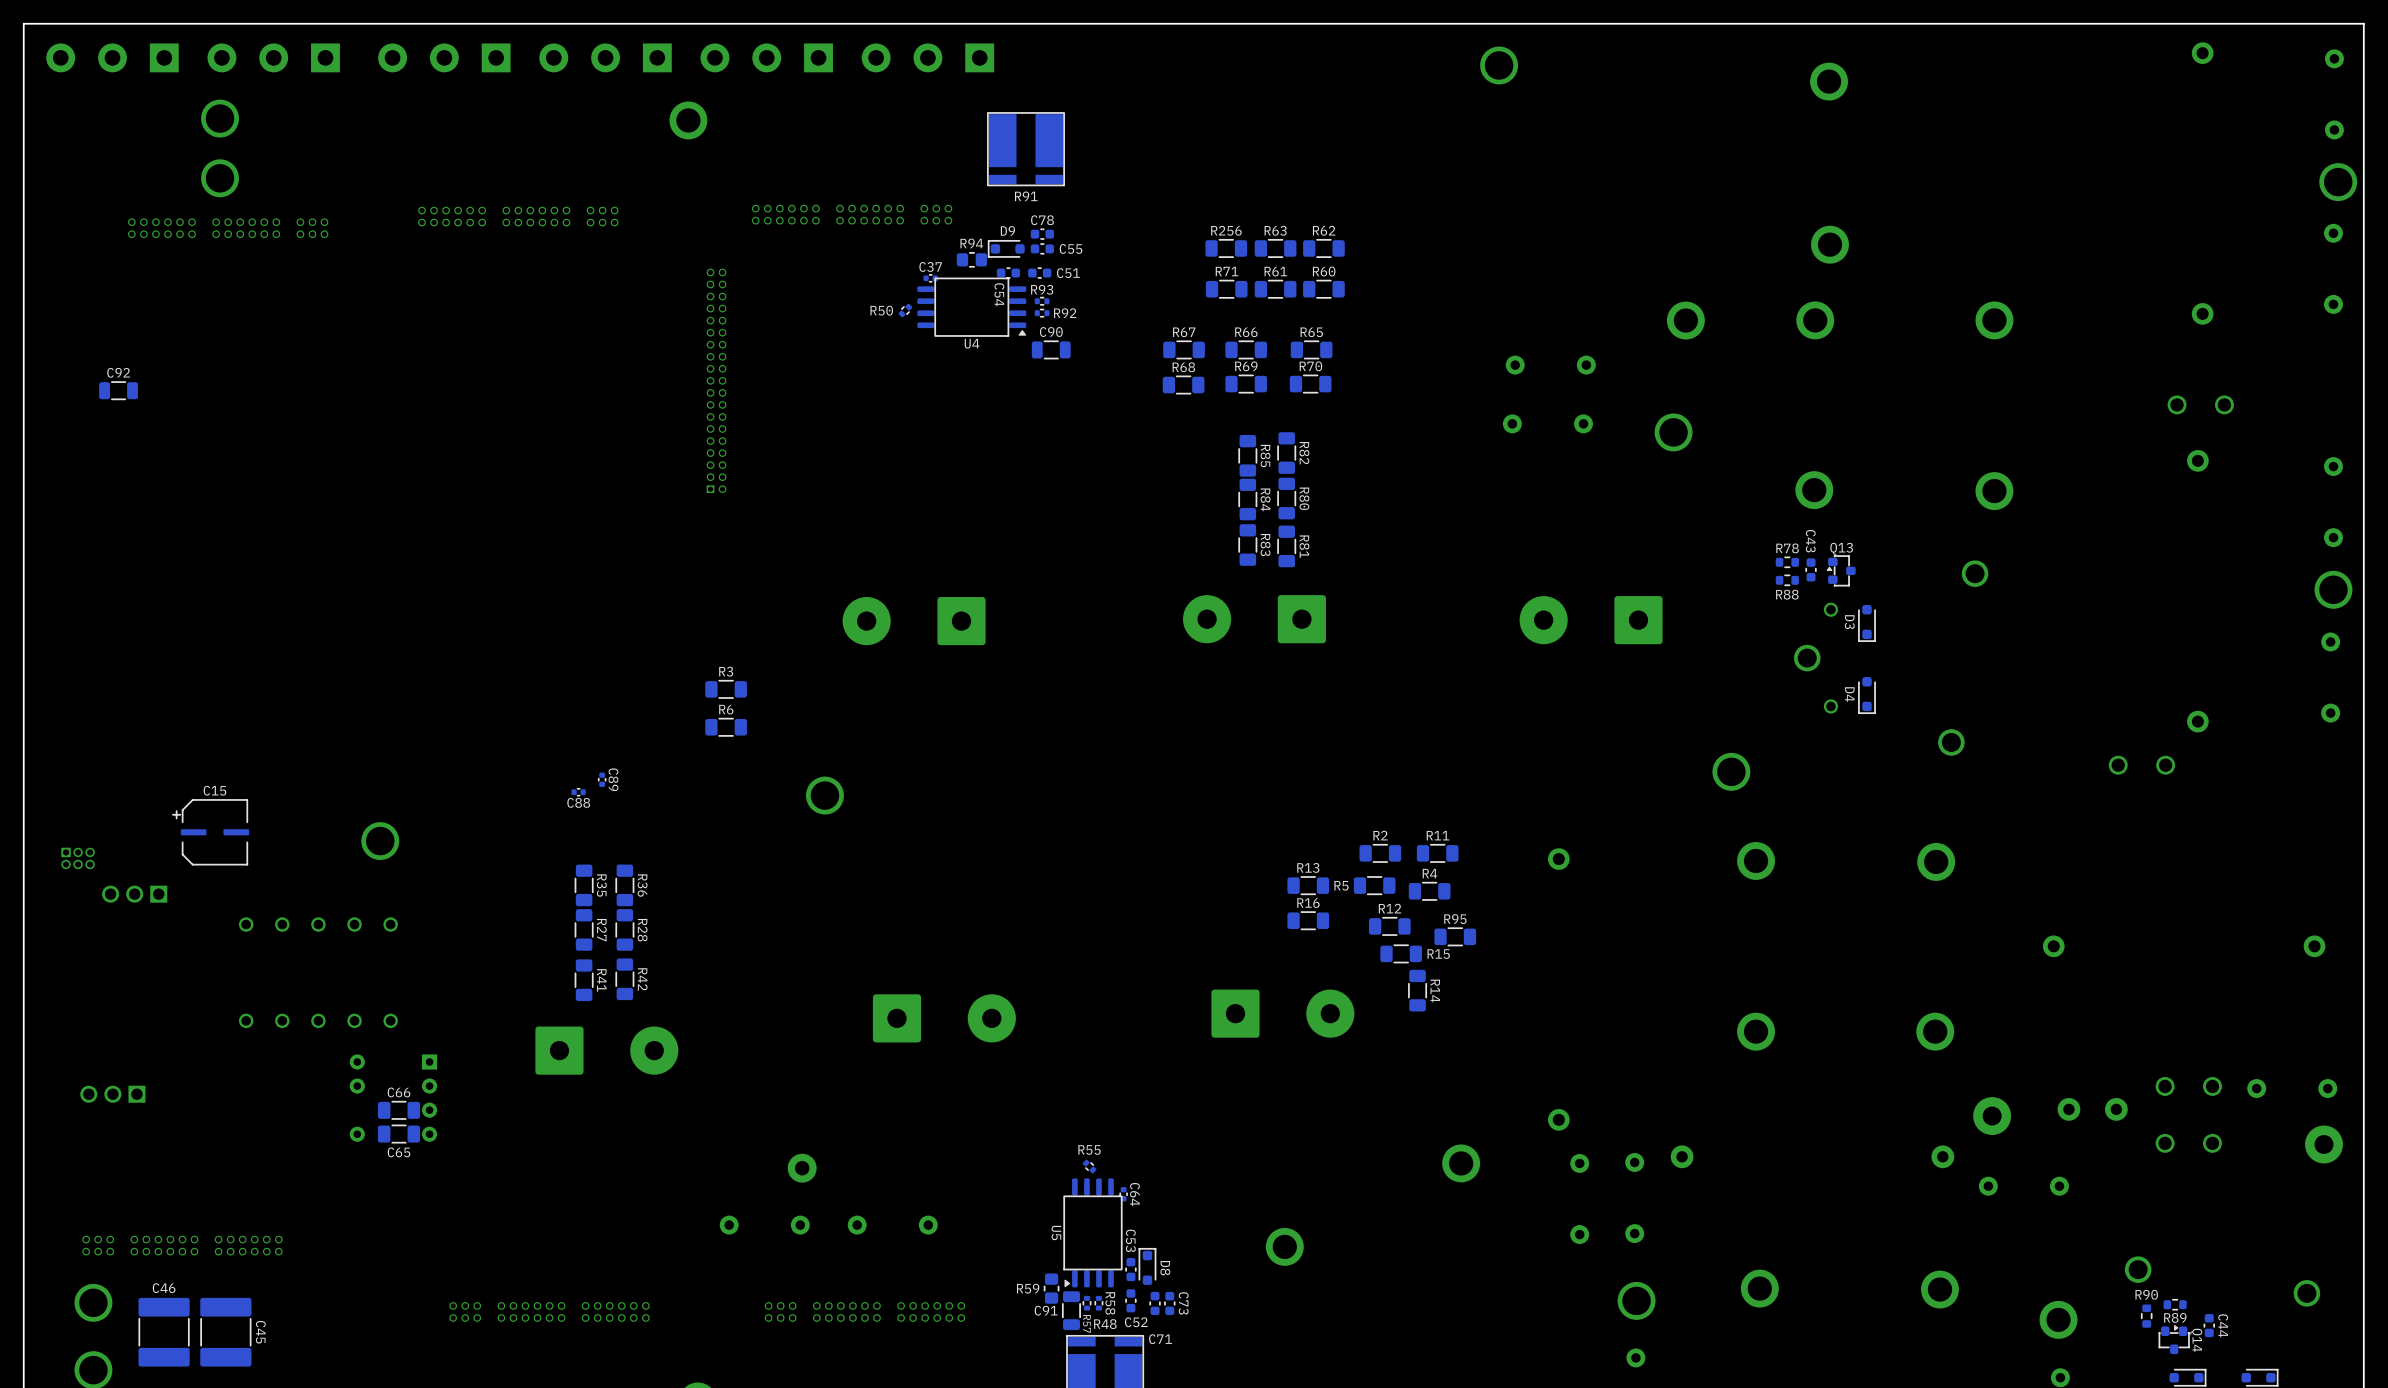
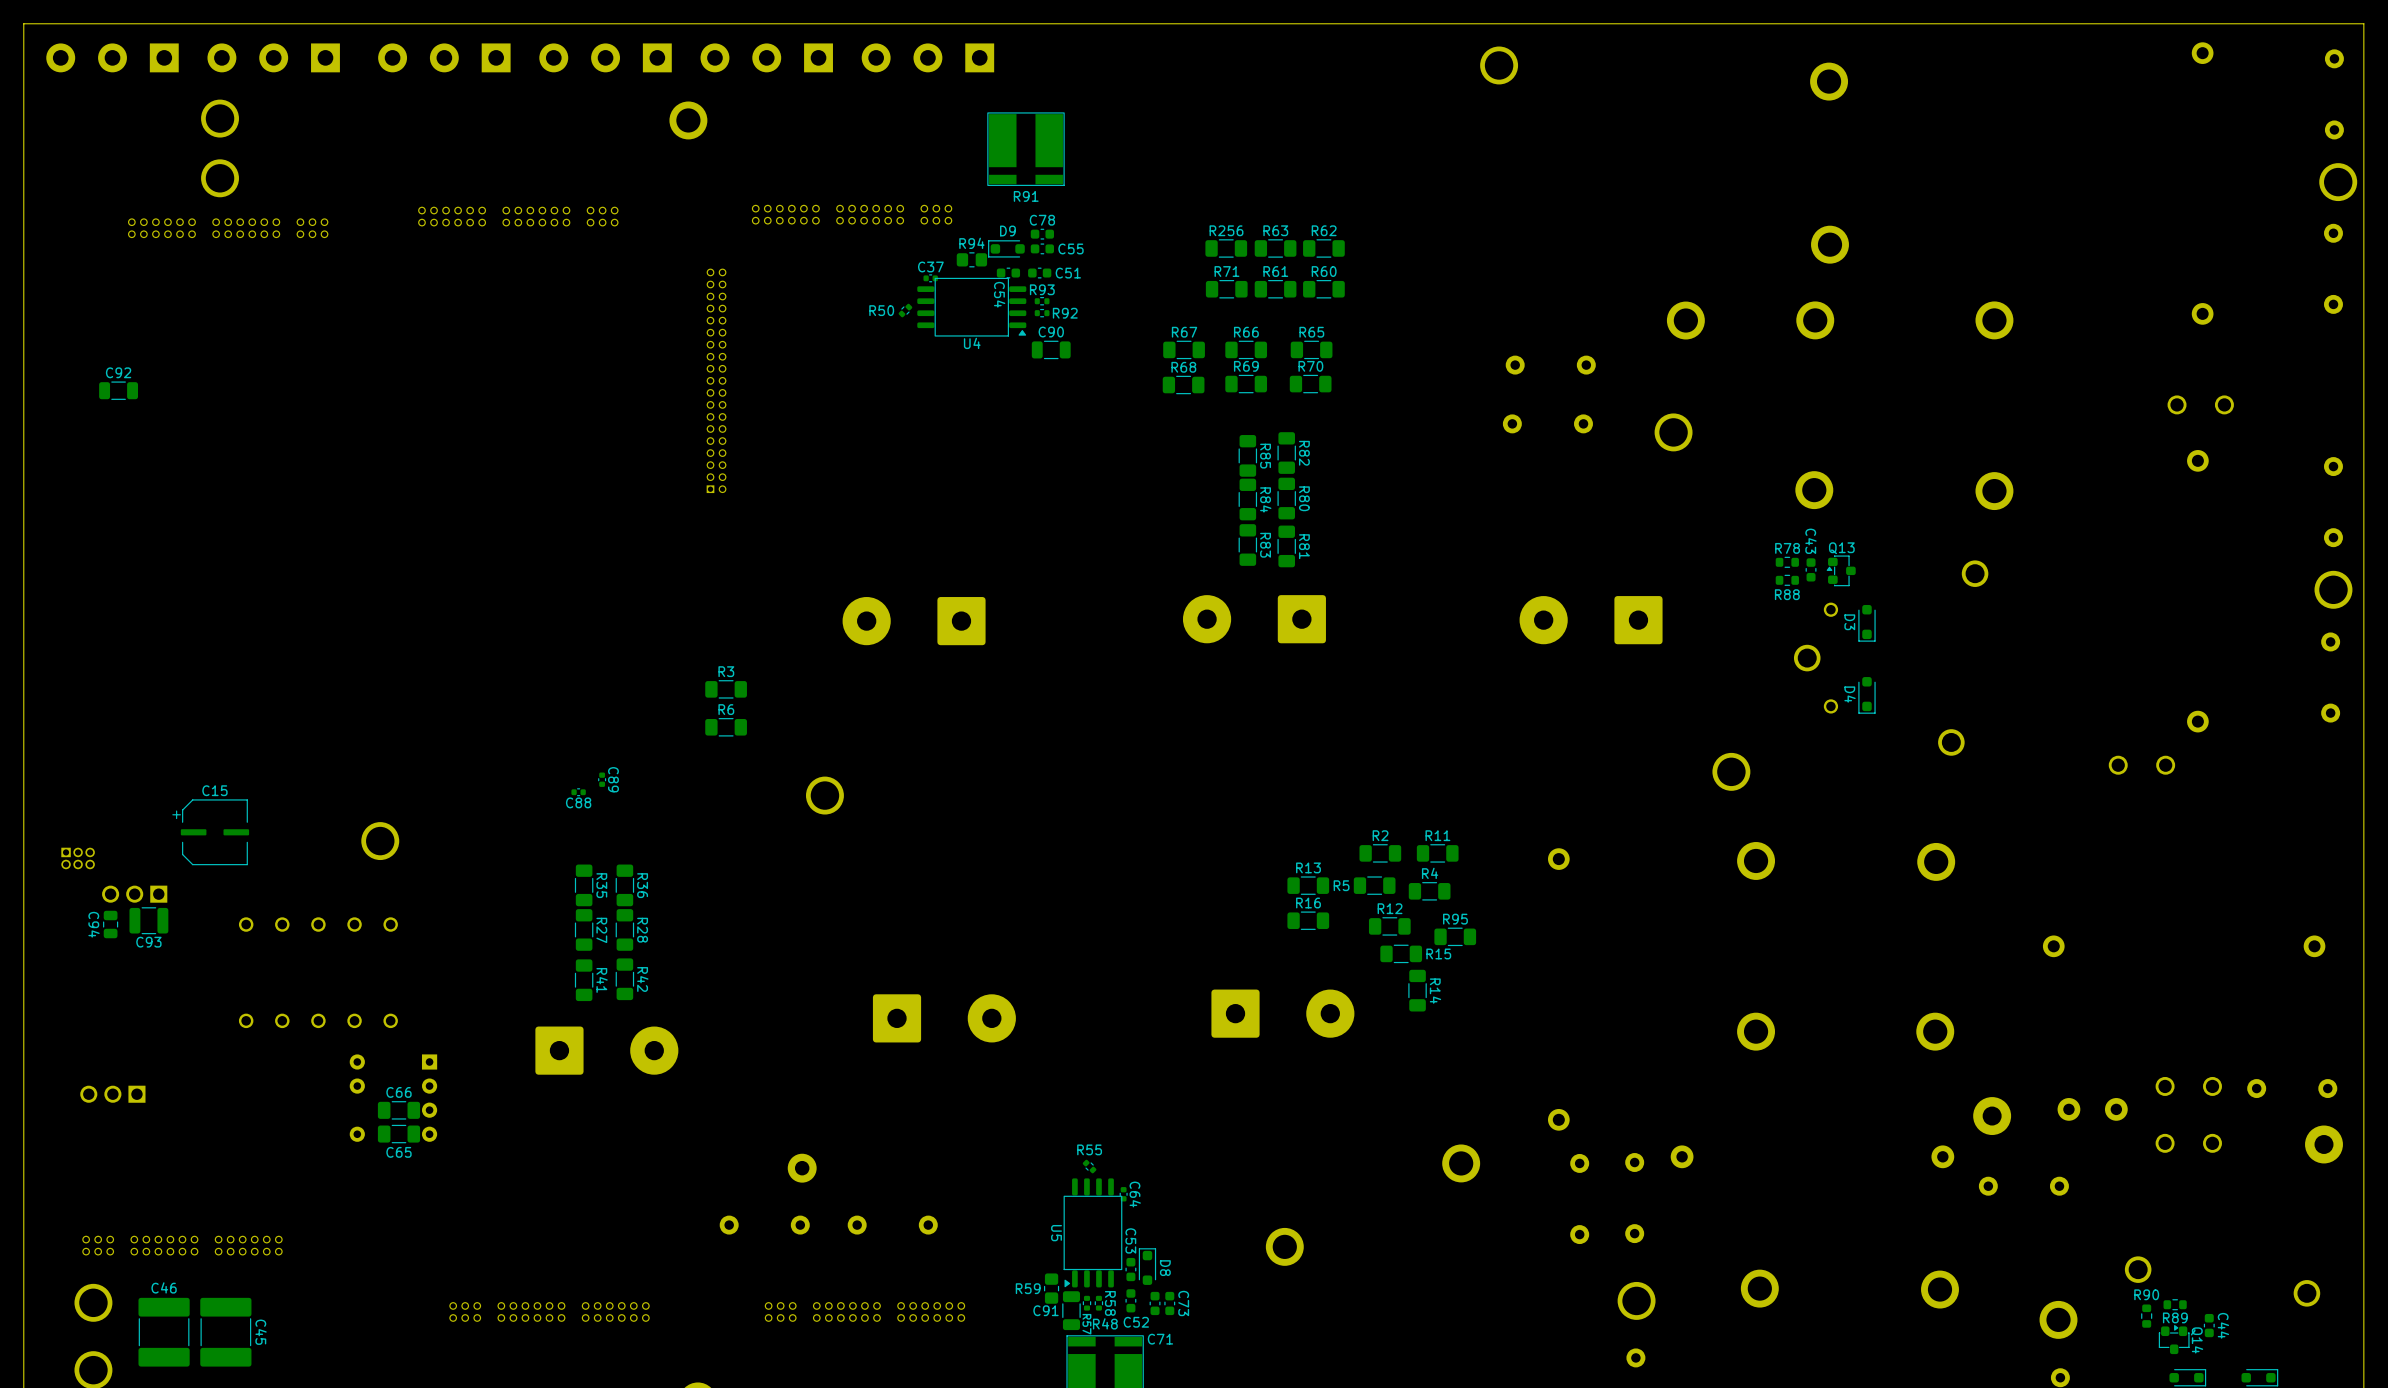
C93: none -> (148, 920)
C94: none -> (110, 924)

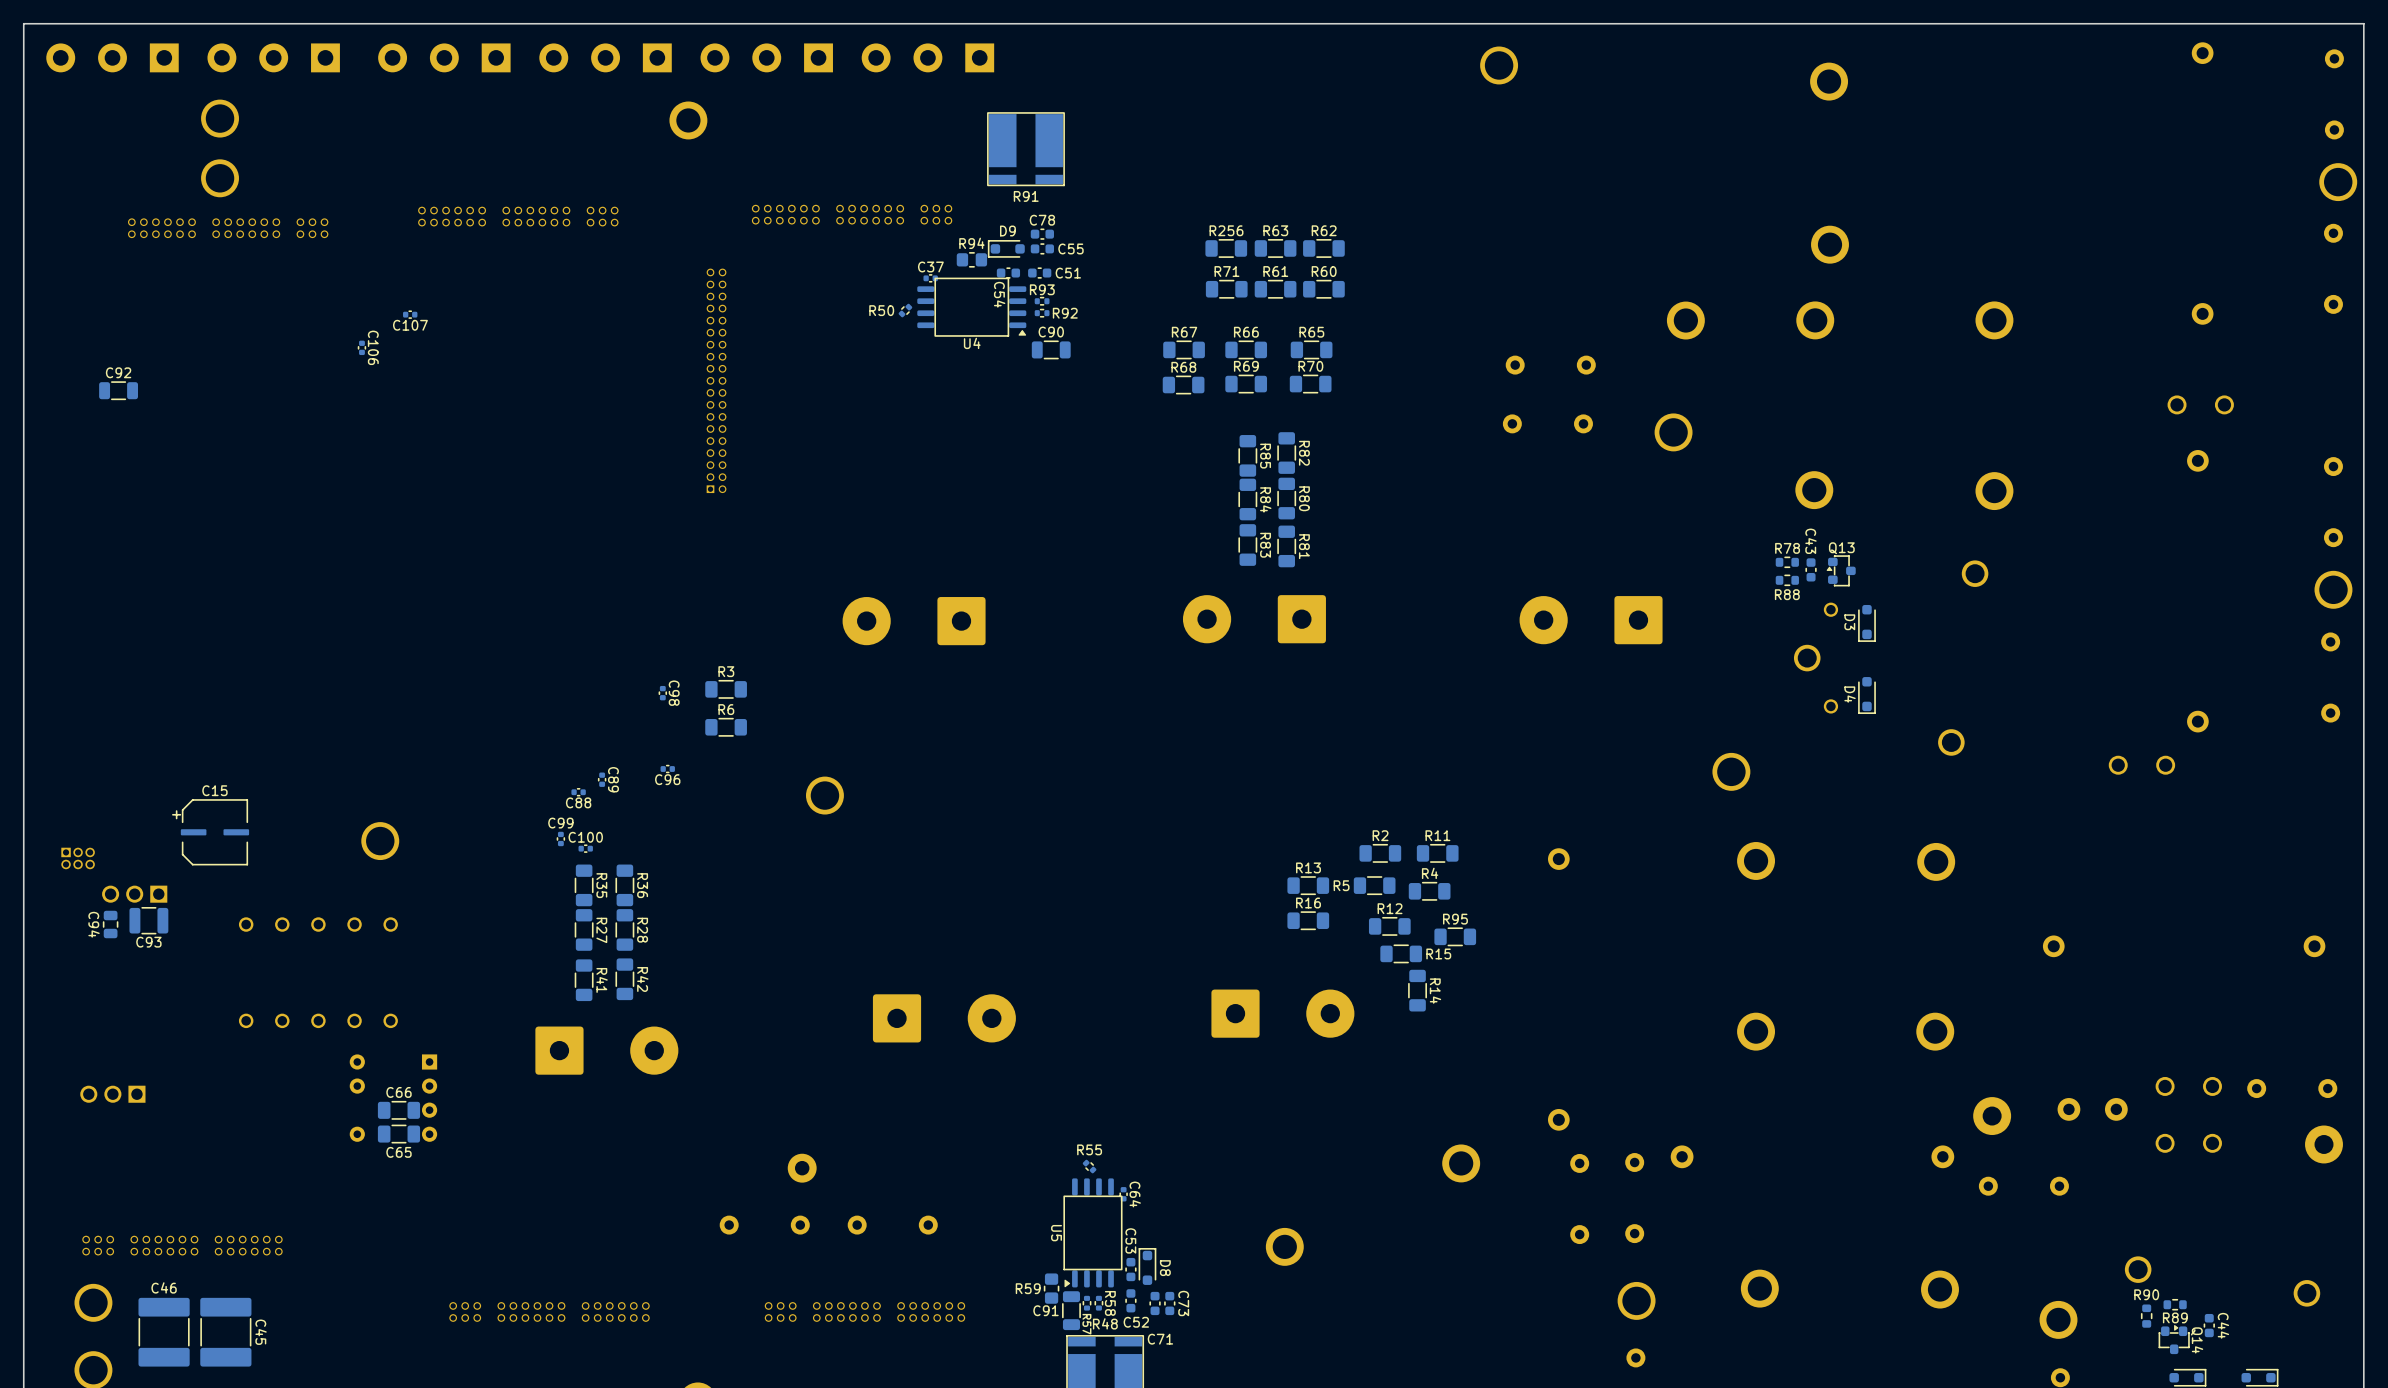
C107: none -> (410, 314)
C106: none -> (361, 347)
C98: none -> (662, 693)
C96: none -> (667, 769)
C99: none -> (560, 838)
C100: none -> (585, 848)

